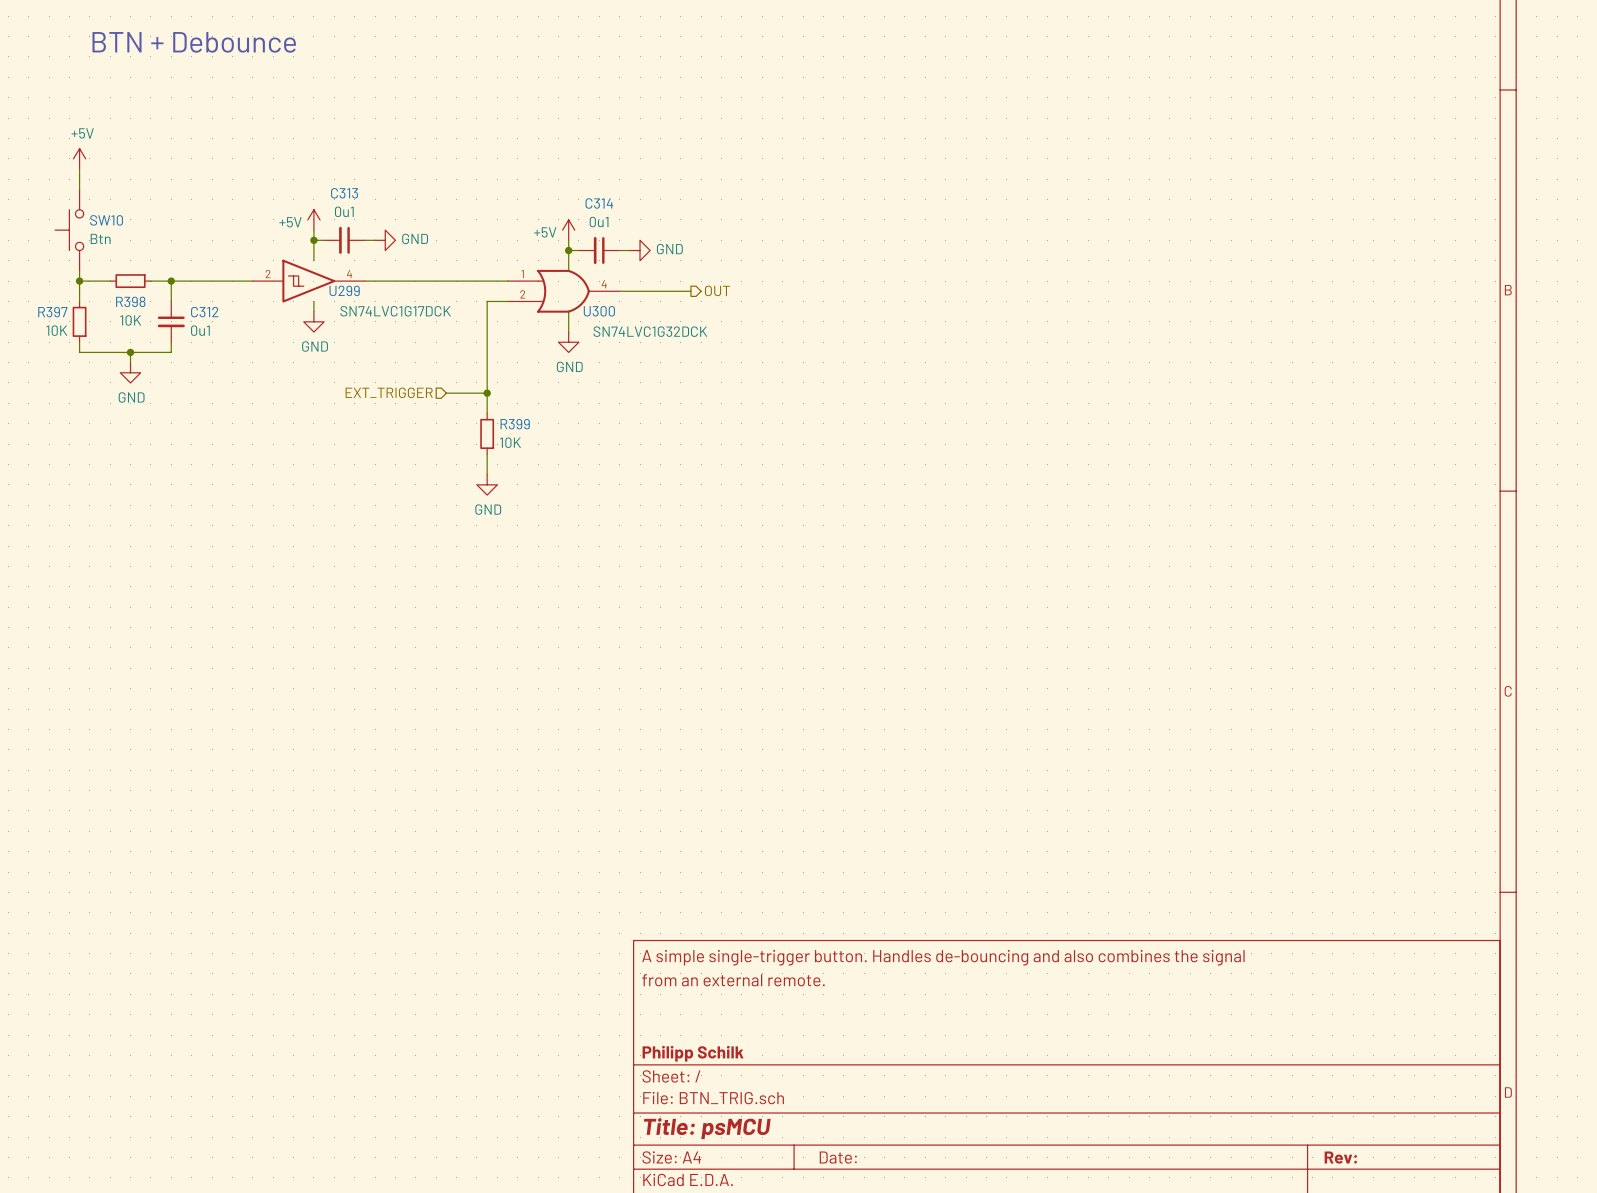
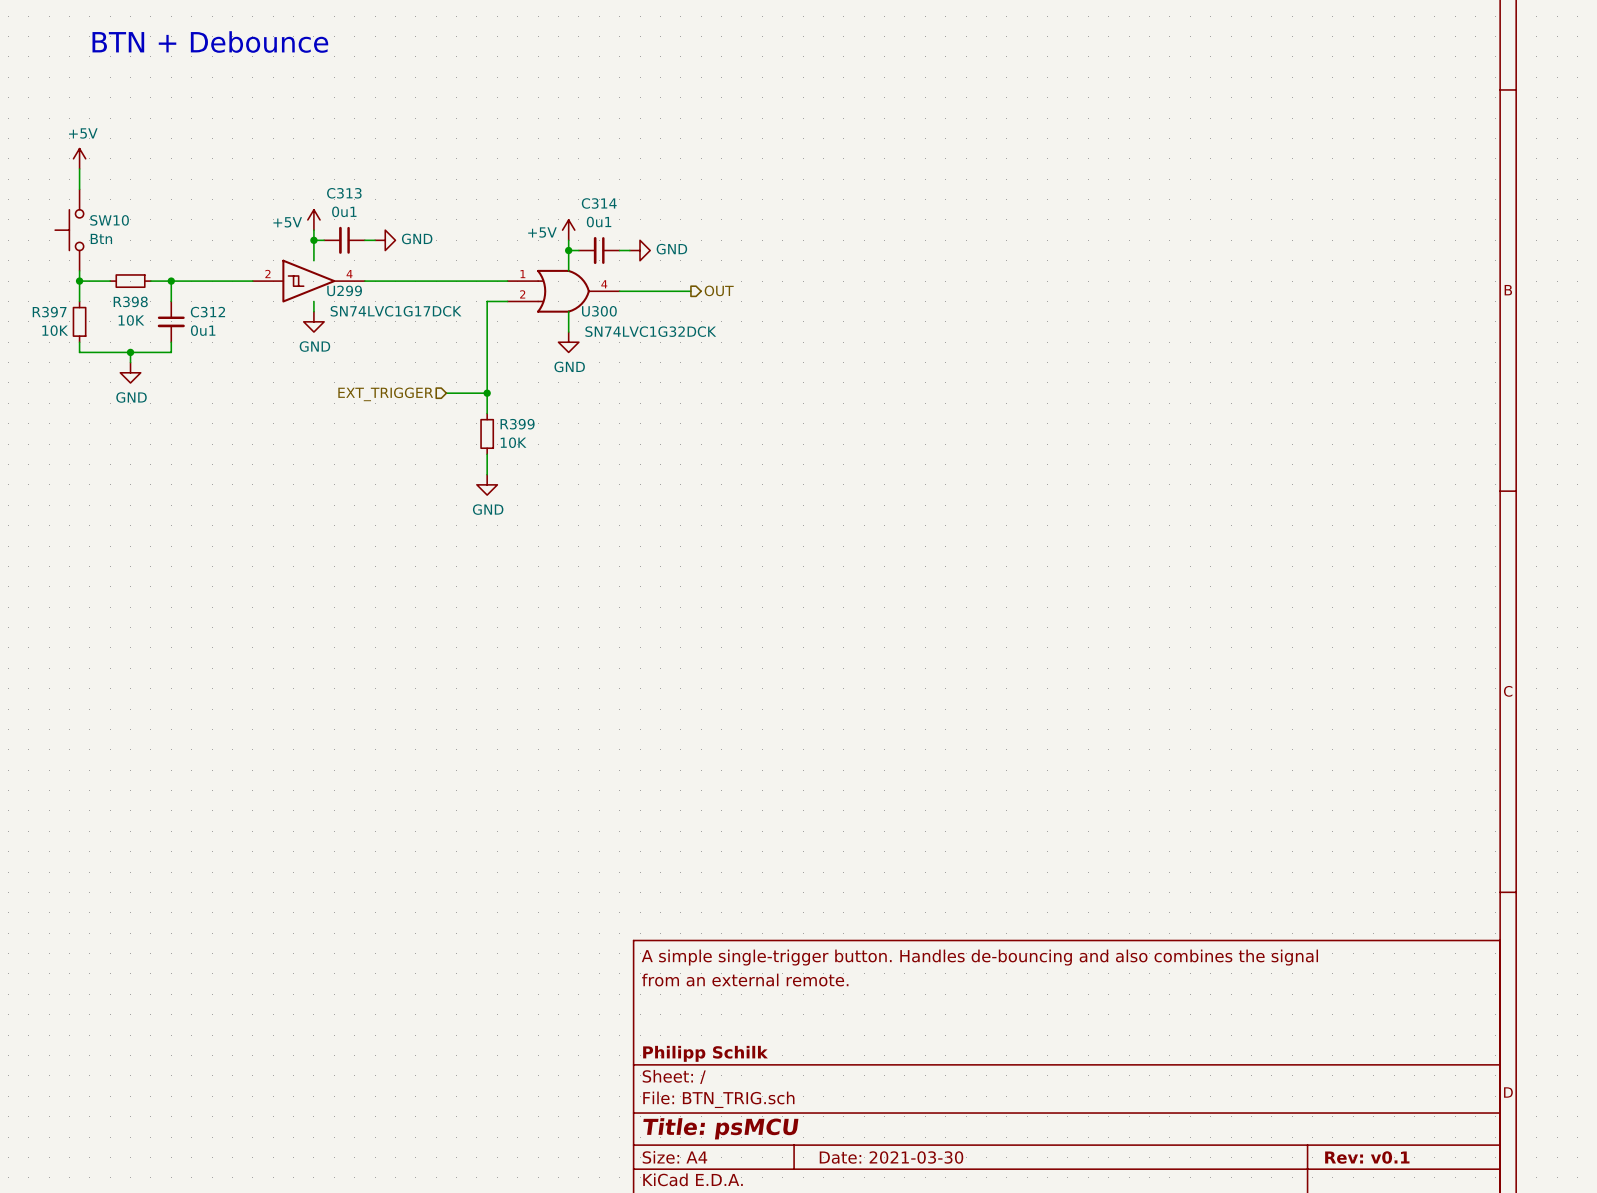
title block: Date: (838, 1157) -> Date: 2021-03-30 (891, 1157)
title block: Rev: (1340, 1157) -> Rev: v0.1 (1367, 1157)

